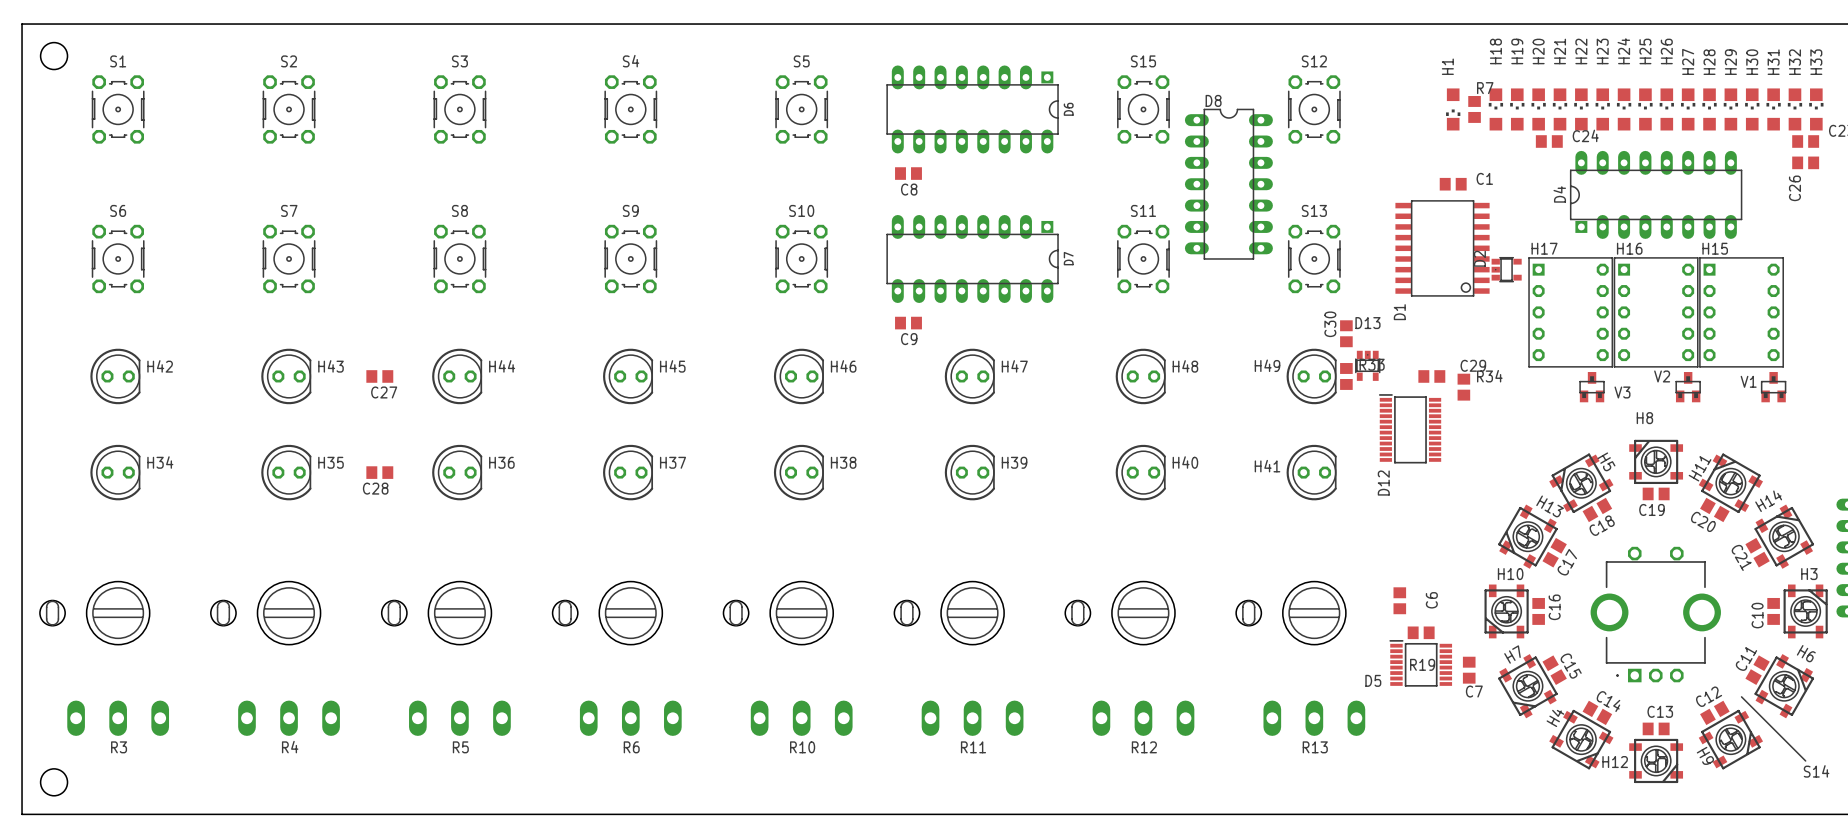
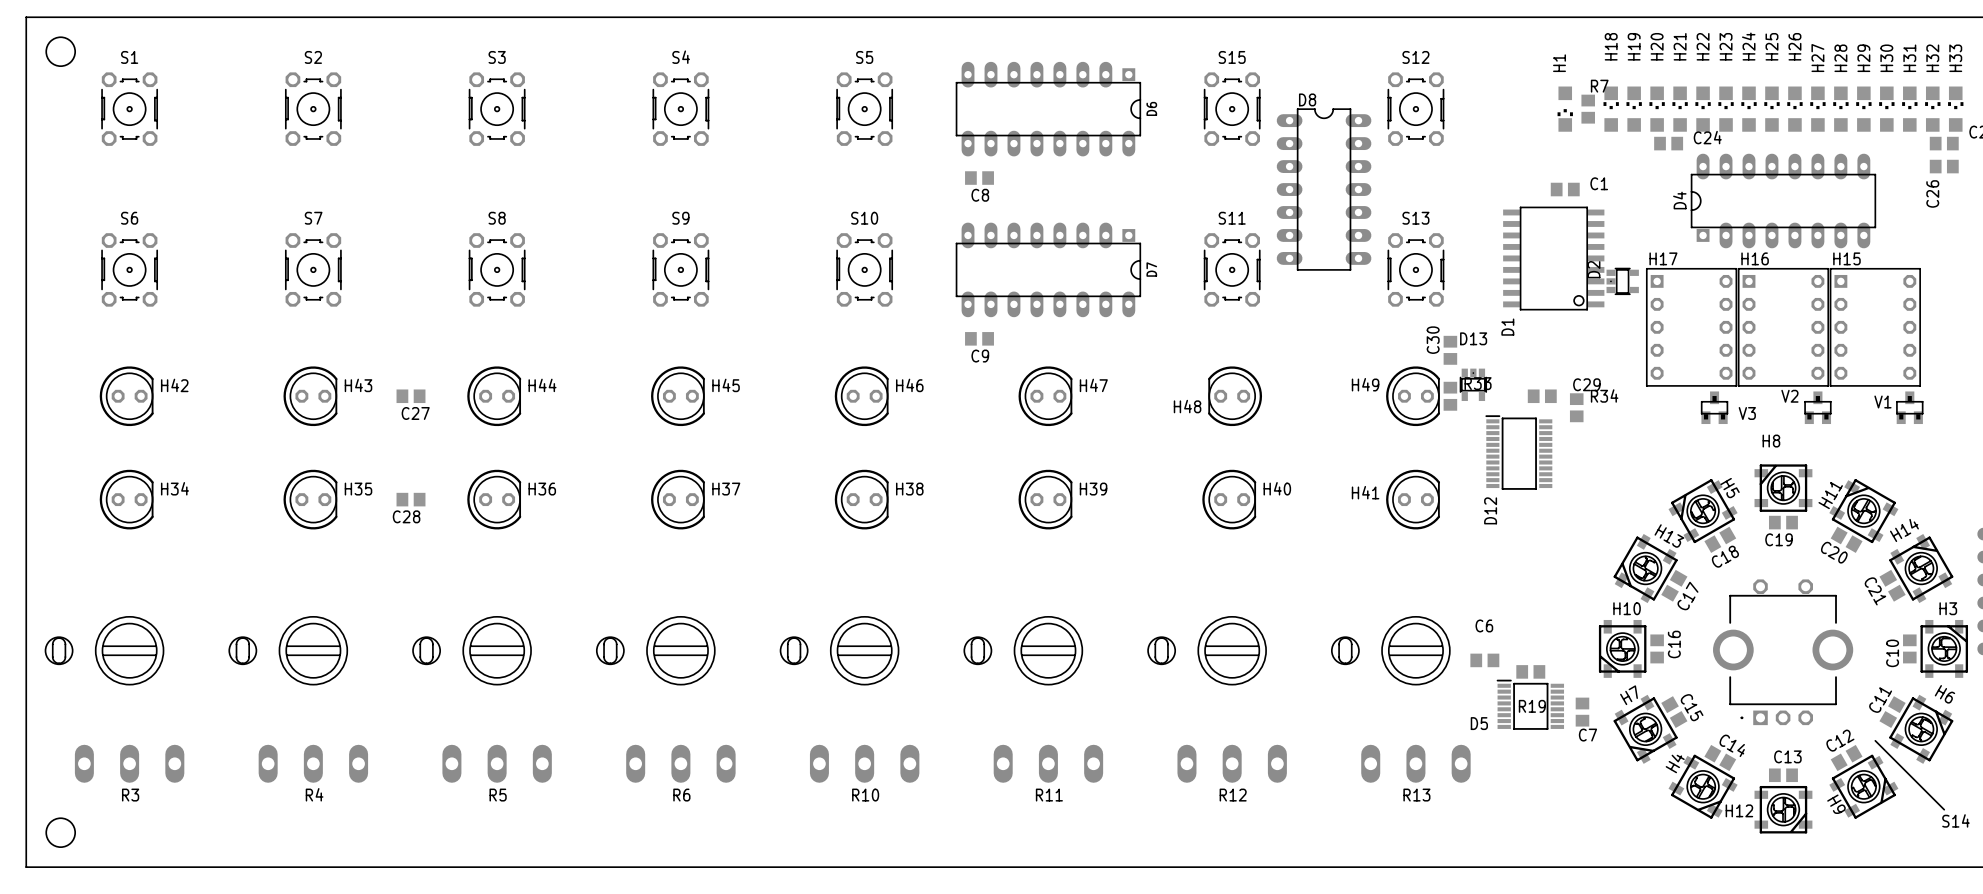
H48 rotation: 0° (1140, 376) -> 180° (1235, 396)
C6 rotation: 0° (1399, 600) -> 90° clockwise (1484, 660)
C6 position: (1399, 600) -> (1484, 660)
C6 name position: C6 (1431, 600) -> C6 (1484, 625)

